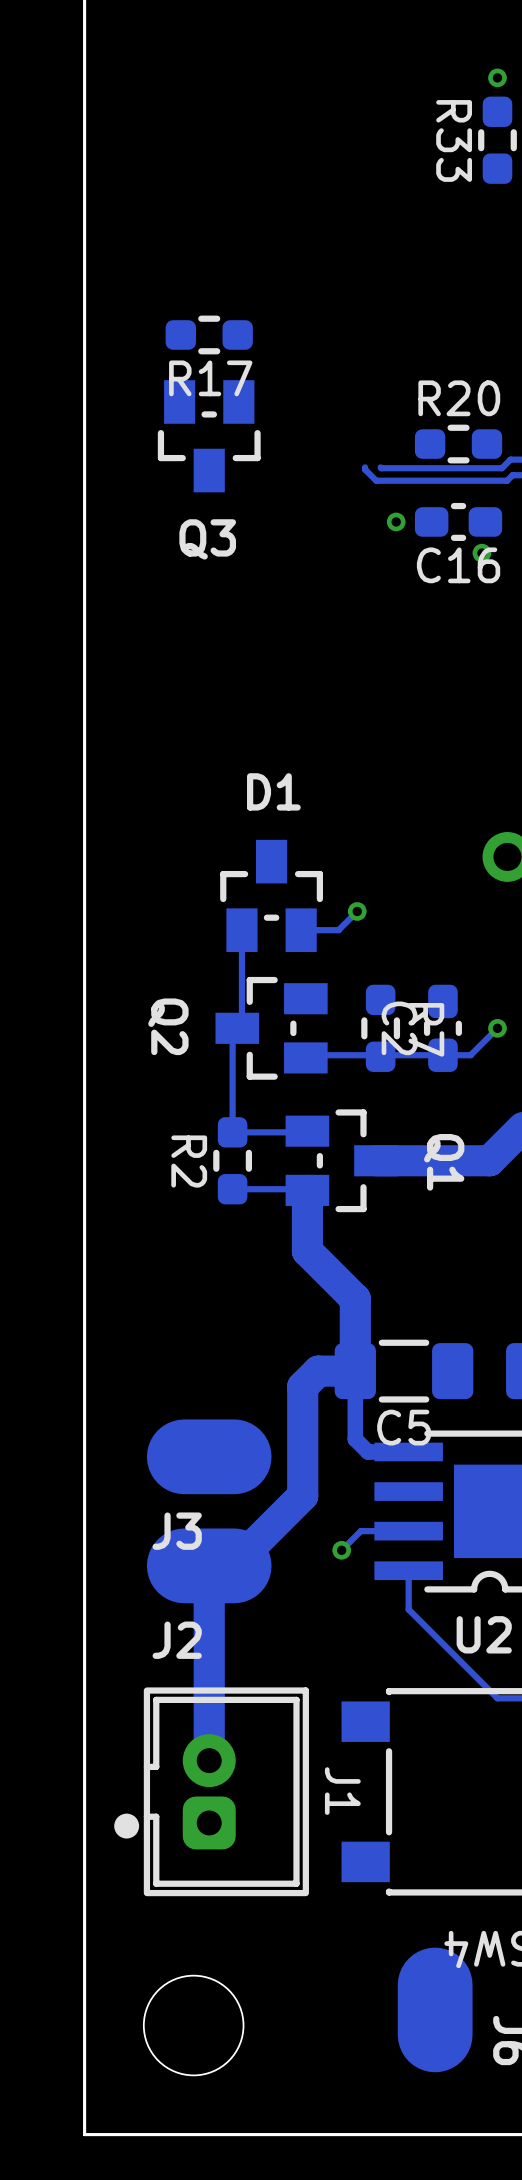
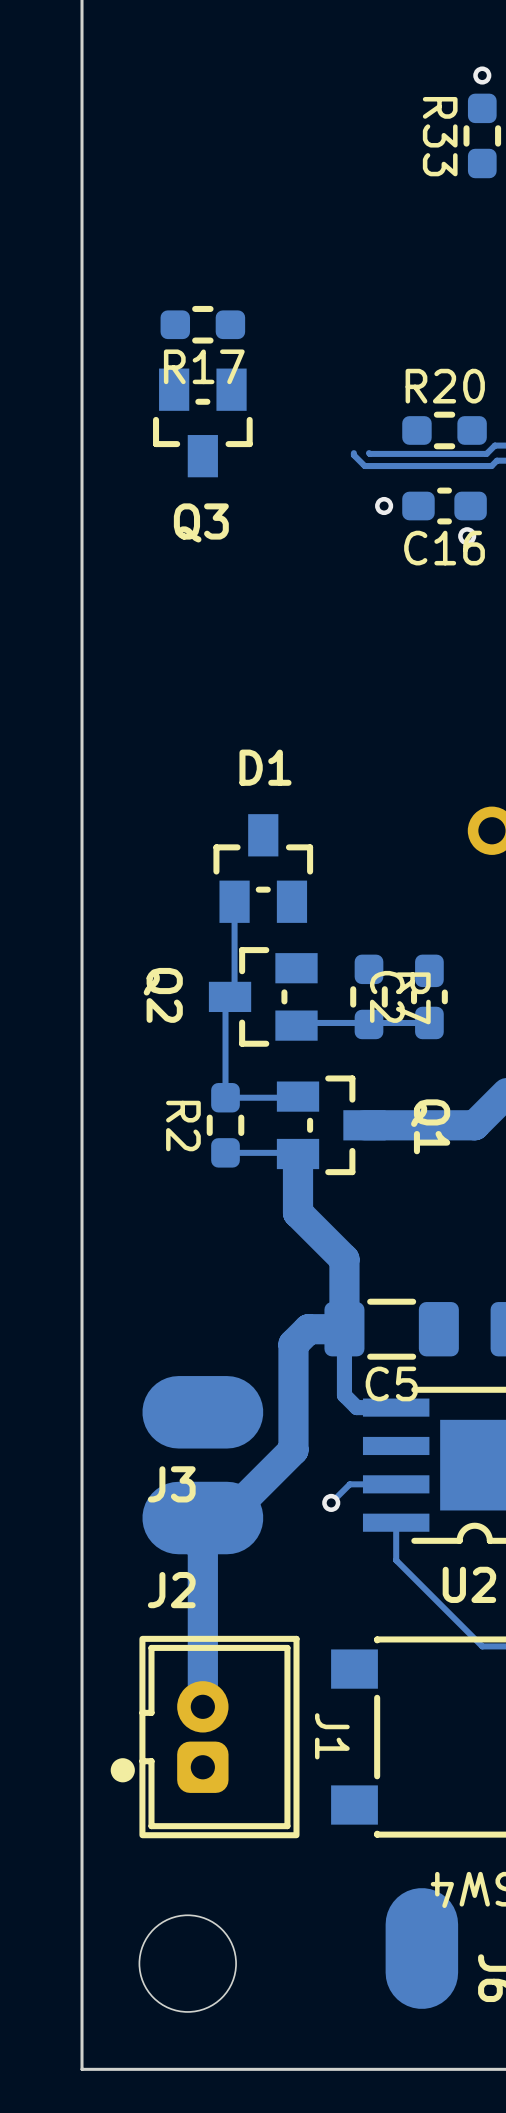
track: (357, 911) (338, 930) (301, 930) -> none
via: (357, 911) -> none
track: (497, 1028) (470, 1055) (442, 1055) -> none
via: (497, 1028) -> none

